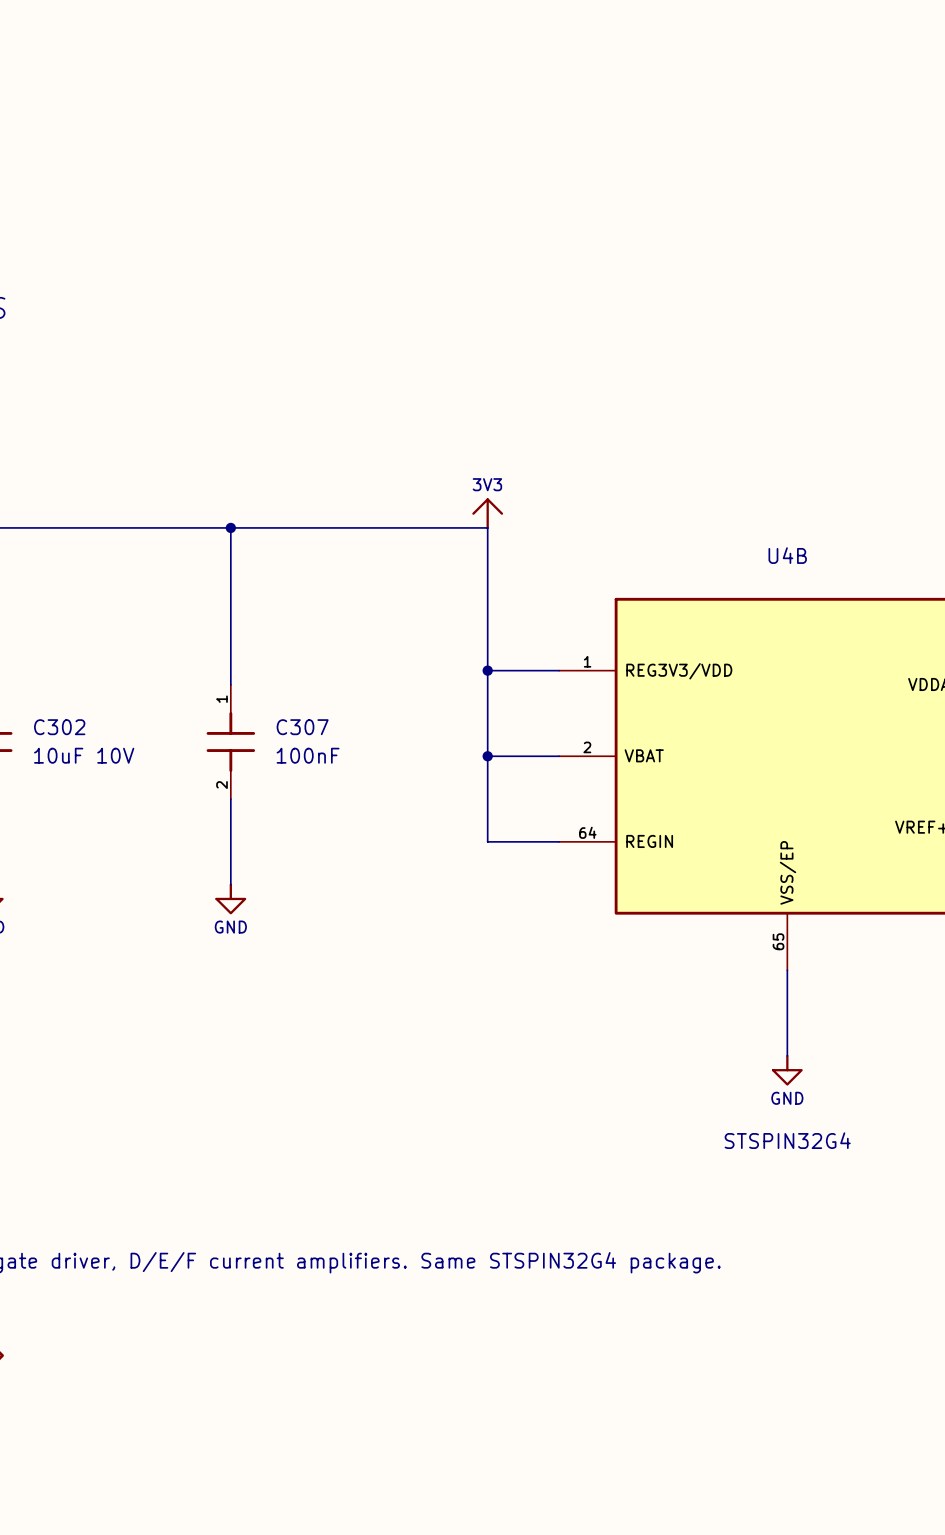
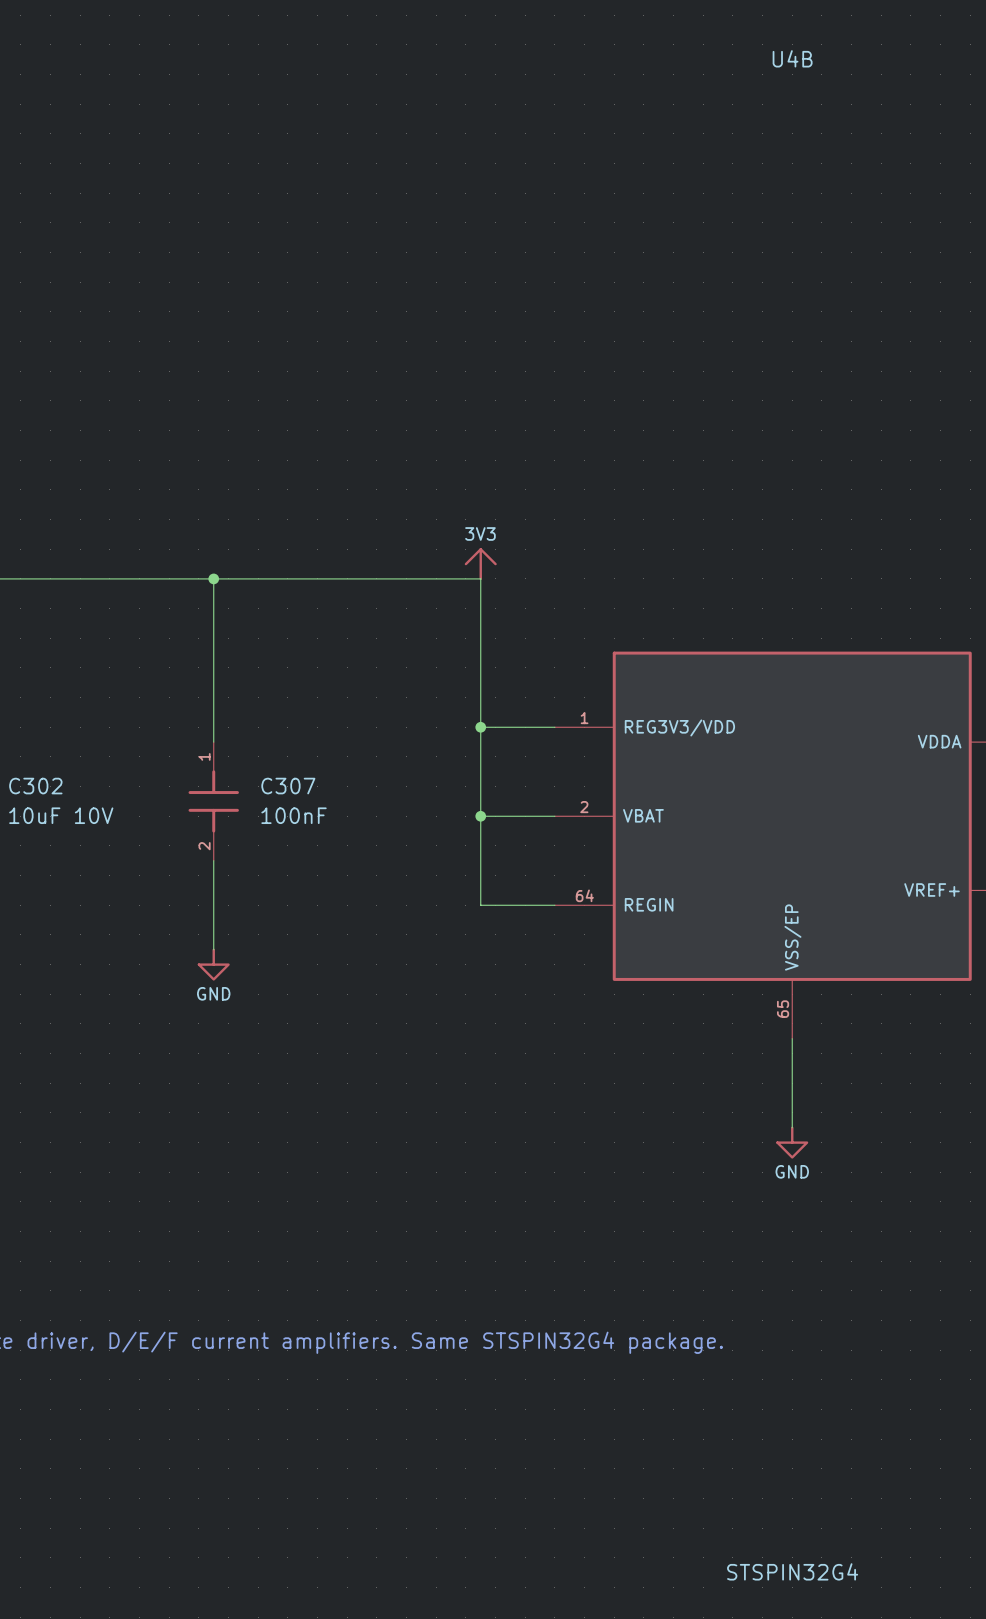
U4B name position: U4B (787, 555) -> U4B (792, 58)
U4B value position: STSPIN32G4 (787, 1140) -> STSPIN32G4 (792, 1571)

